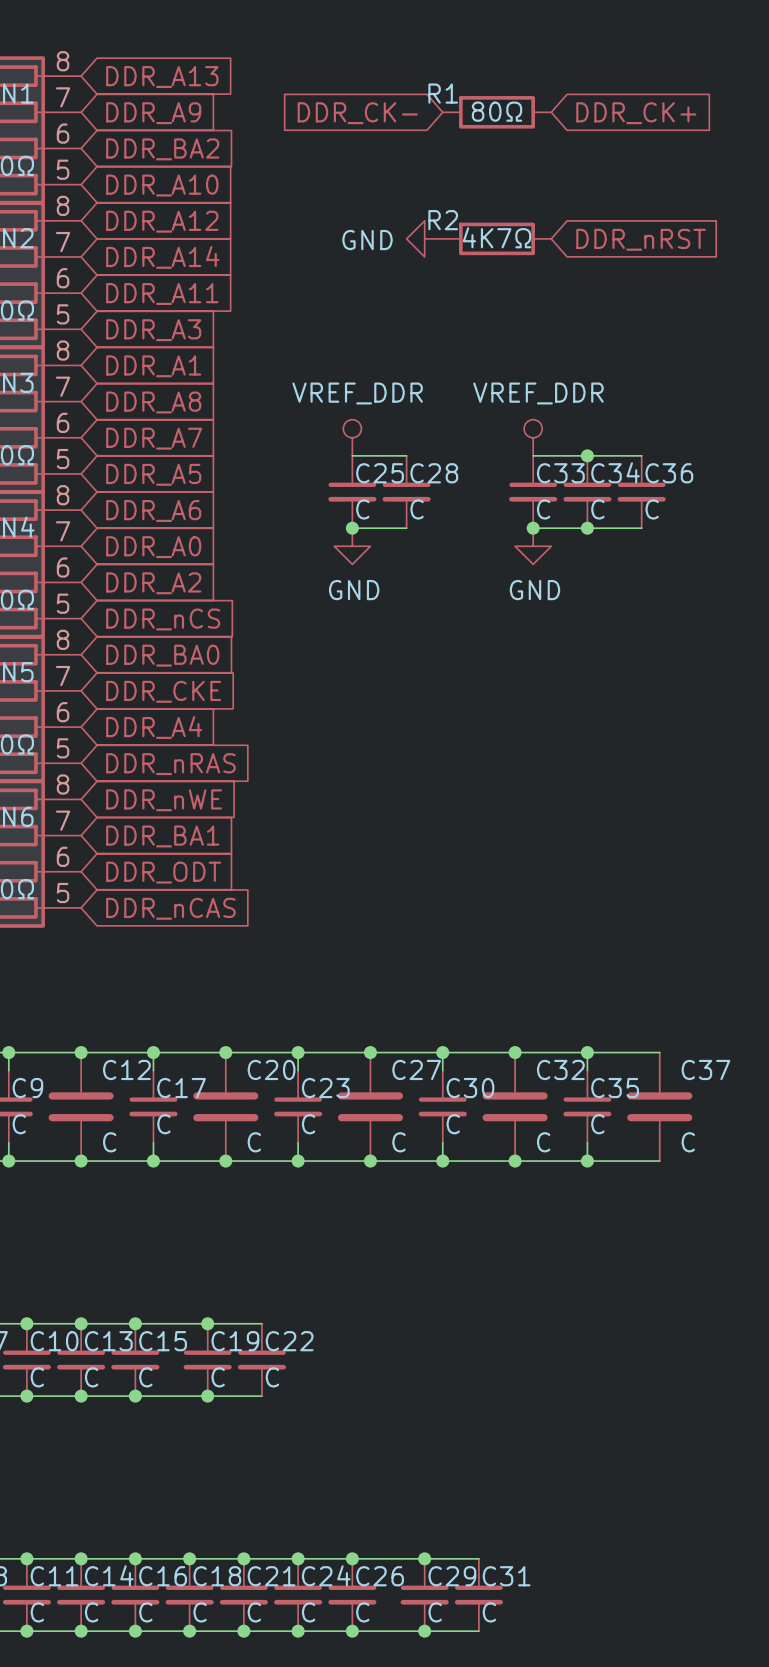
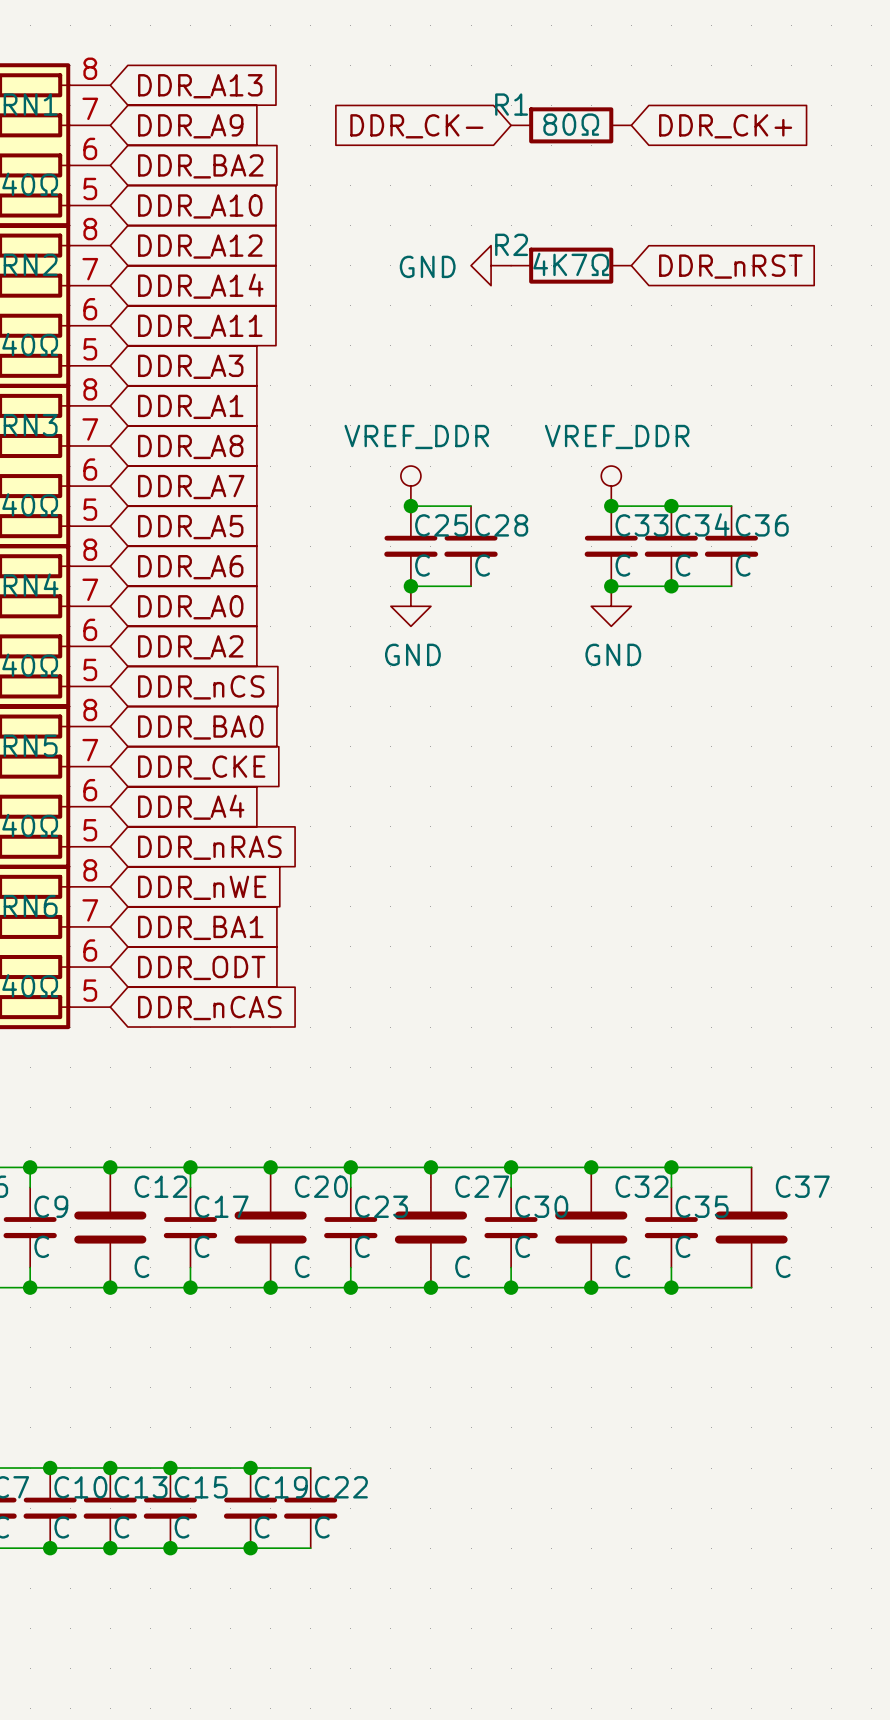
junction: none -> (410, 506)
junction: none -> (611, 506)

